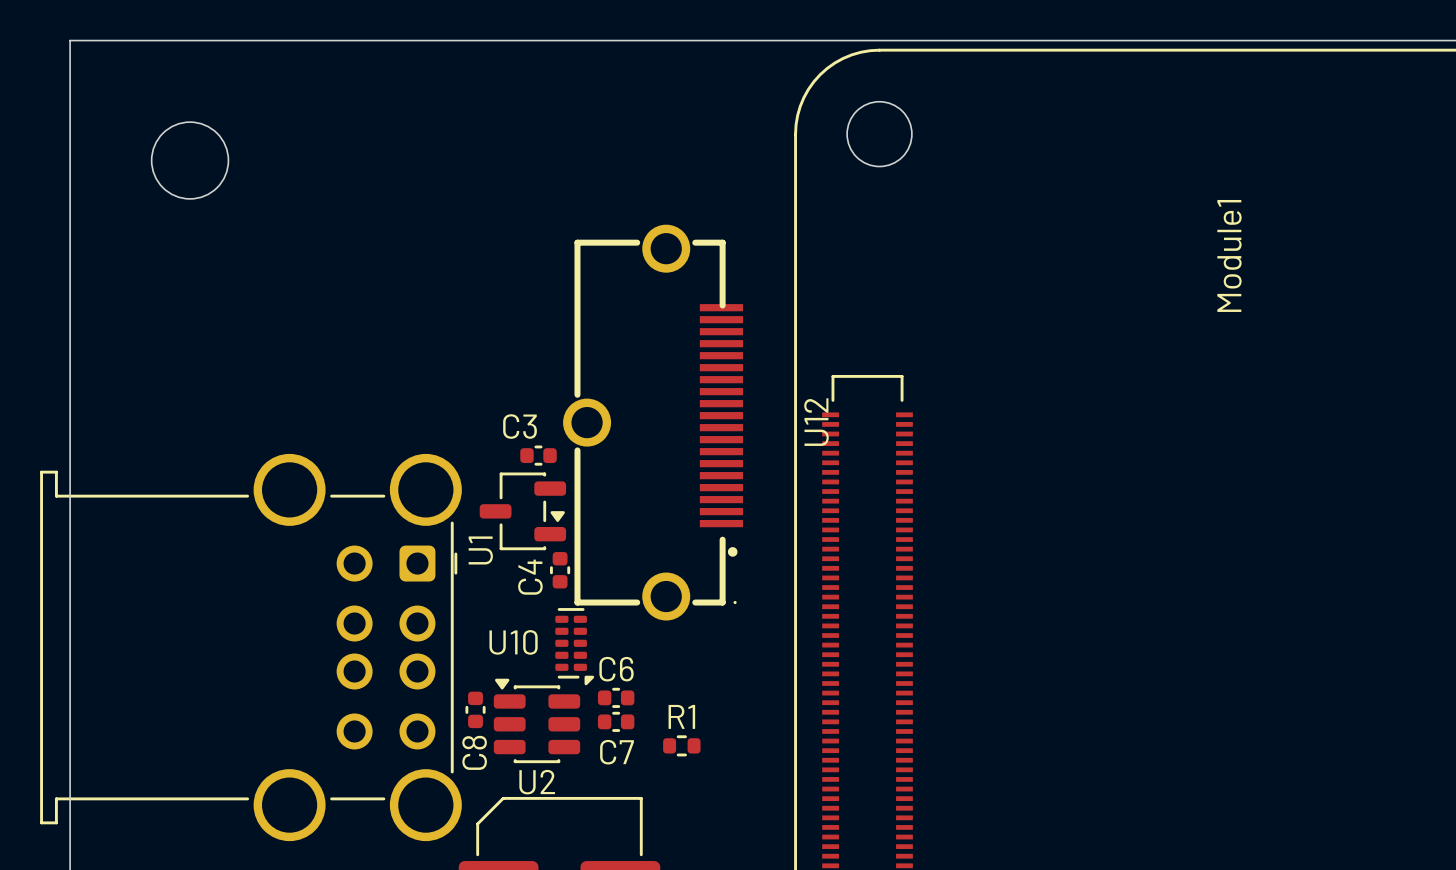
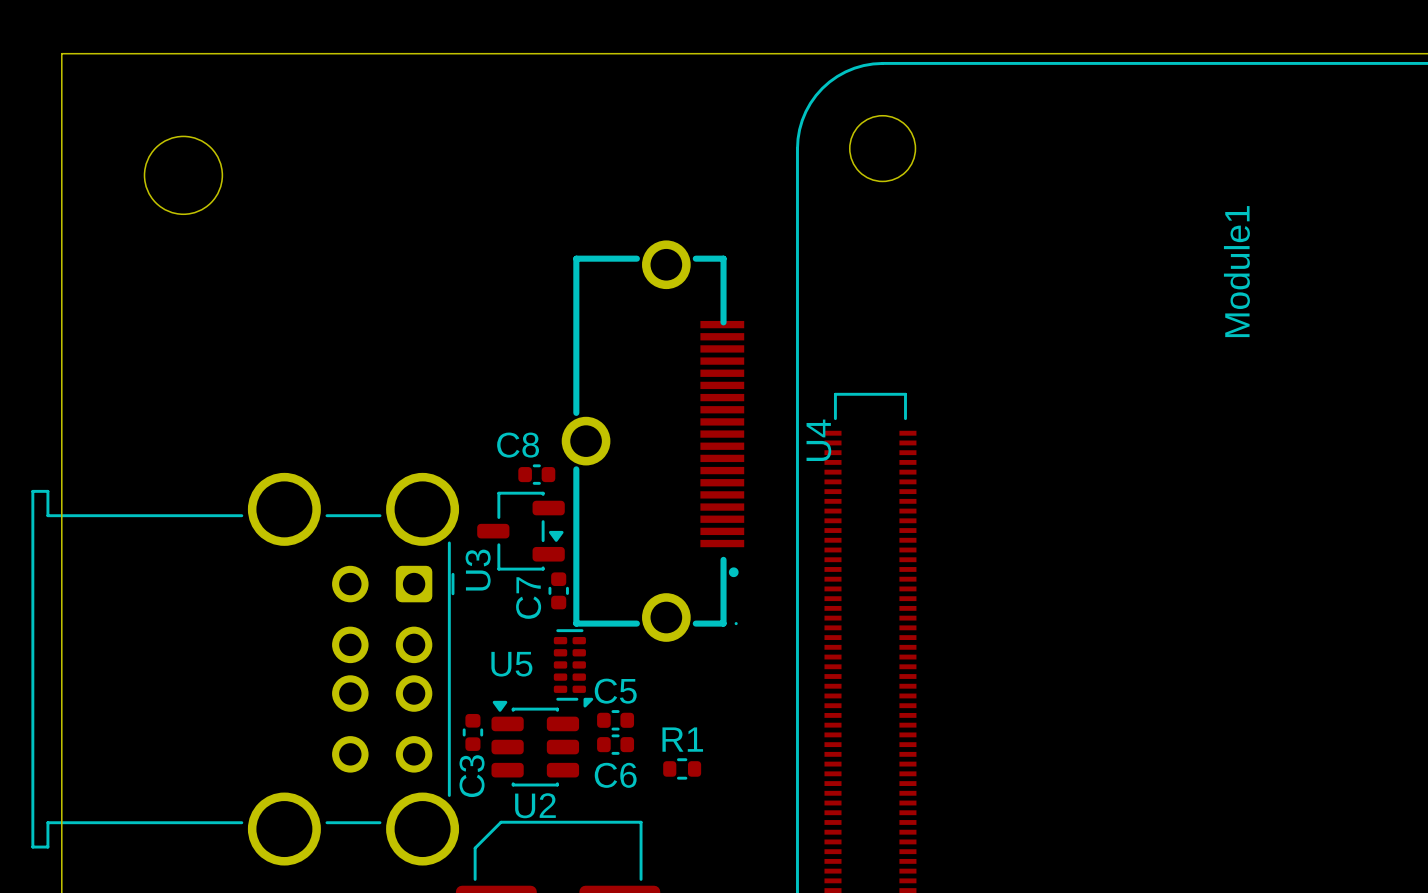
U12 name: U12 (816, 422) -> U4 (818, 440)
C3 name: C3 (520, 426) -> C8 (518, 445)
U1 name: U1 (480, 550) -> U3 (478, 570)
C4 name: C4 (530, 577) -> C7 (528, 598)
U10 name: U10 (513, 642) -> U5 (511, 664)
C6 name: C6 (616, 669) -> C5 (615, 691)
C8 name: C8 (474, 752) -> C3 (472, 776)
C7 name: C7 (617, 752) -> C6 (615, 775)

